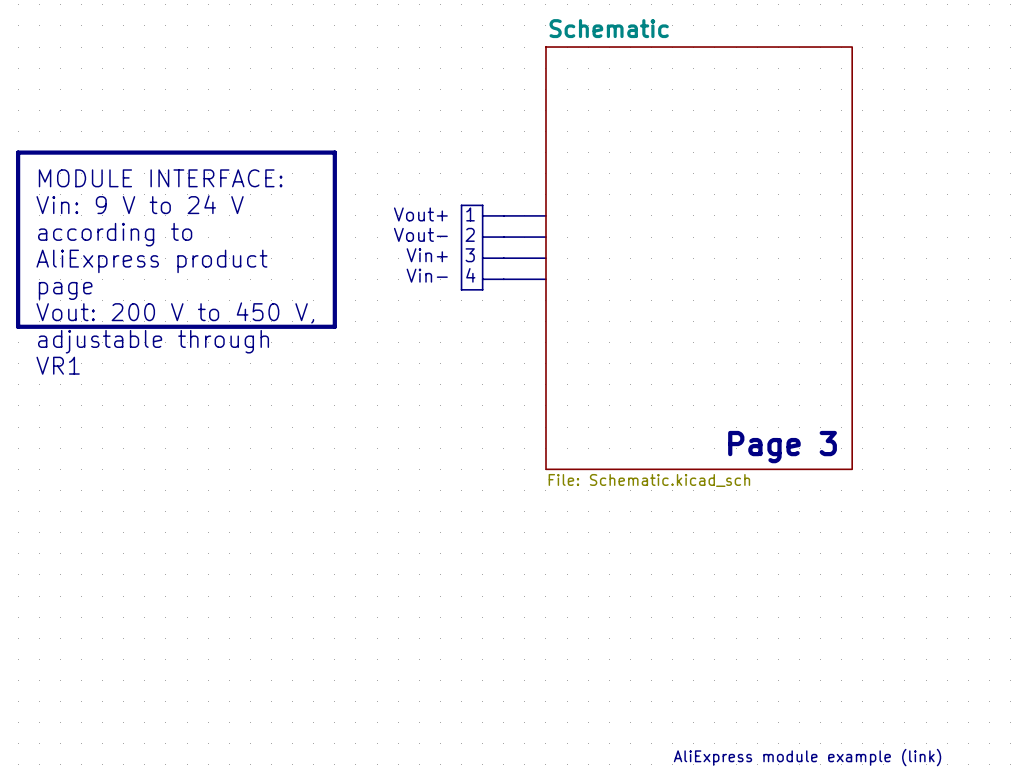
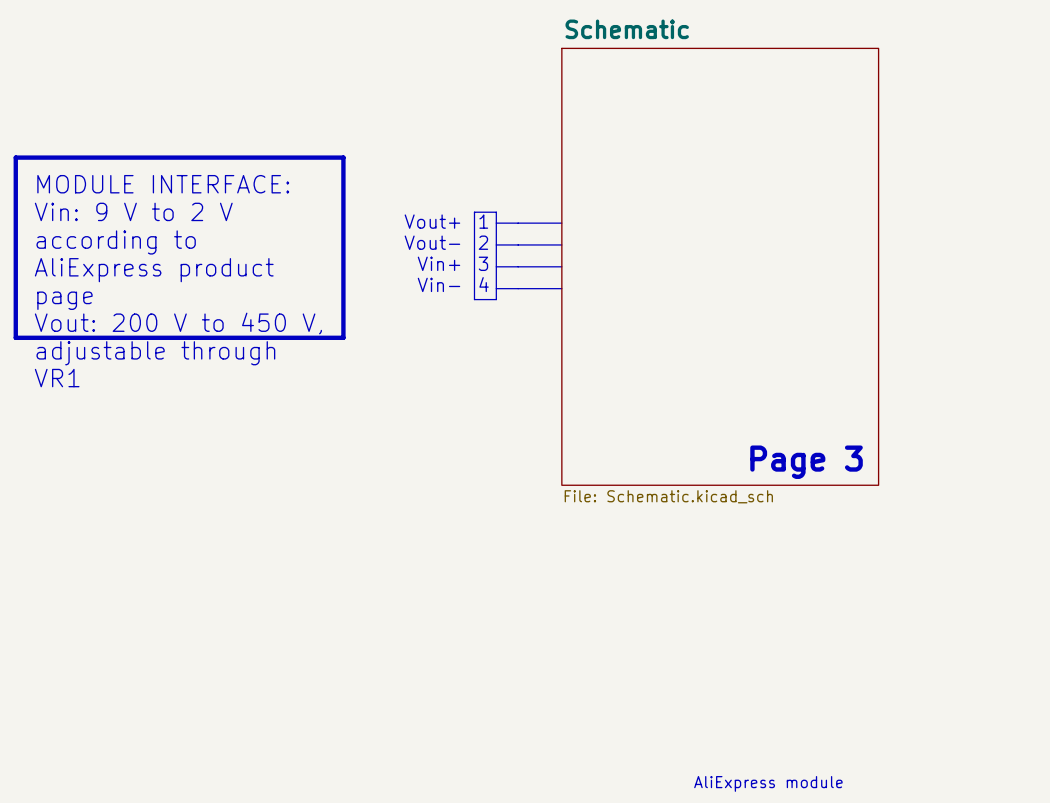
text: Vin: 9 V to 24 V (140, 204) -> Vin: 9 V to 2 V (133, 211)
text: AliExpress module example (link) (807, 757) -> AliExpress module (768, 783)

